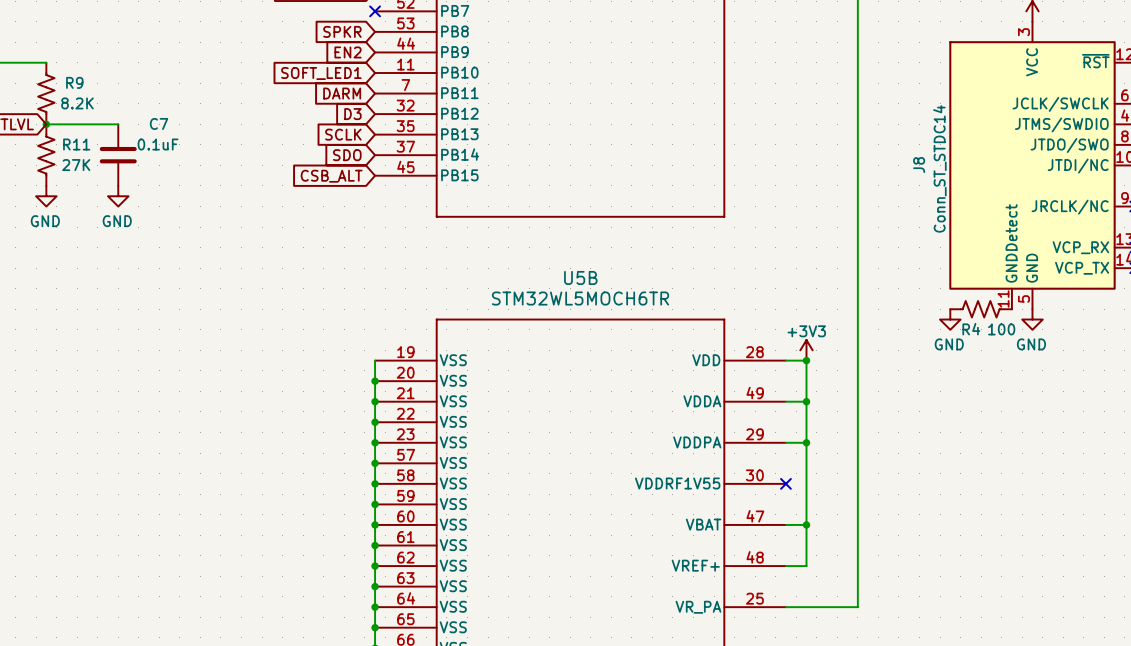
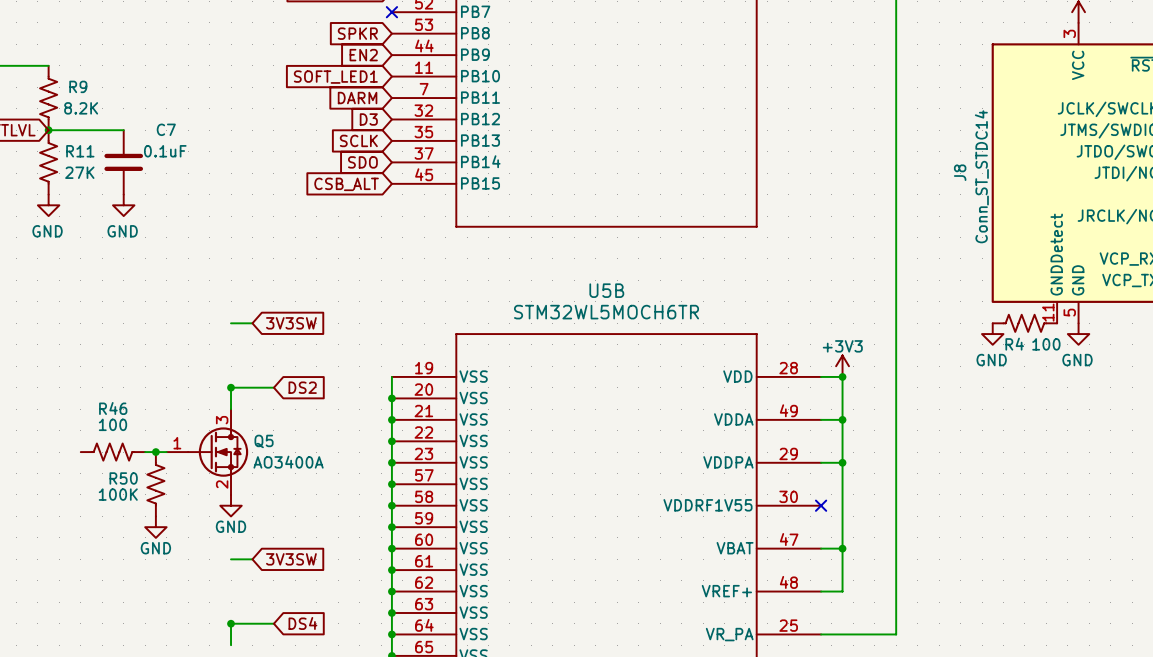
wire: none -> (231, 323) (252, 323)
global label: none -> 3V3SW (291, 323)
junction: none -> (231, 387)
wire: none -> (273, 387) (231, 387) (231, 409)
global label: none -> DS2 (302, 387)
R46: none -> 100 (112, 452)
wire: none -> (145, 452) (166, 452)
junction: none -> (155, 452)
Q5: none -> AO3400A (207, 452)
R50: none -> 100K (155, 484)
power symbol: none -> GND (231, 505)
power symbol: none -> GND (155, 527)
wire: none -> (231, 559) (252, 559)
global label: none -> 3V3SW (291, 559)
junction: none -> (231, 623)
wire: none -> (273, 623) (231, 623) (231, 645)
global label: none -> DS4 (302, 623)

